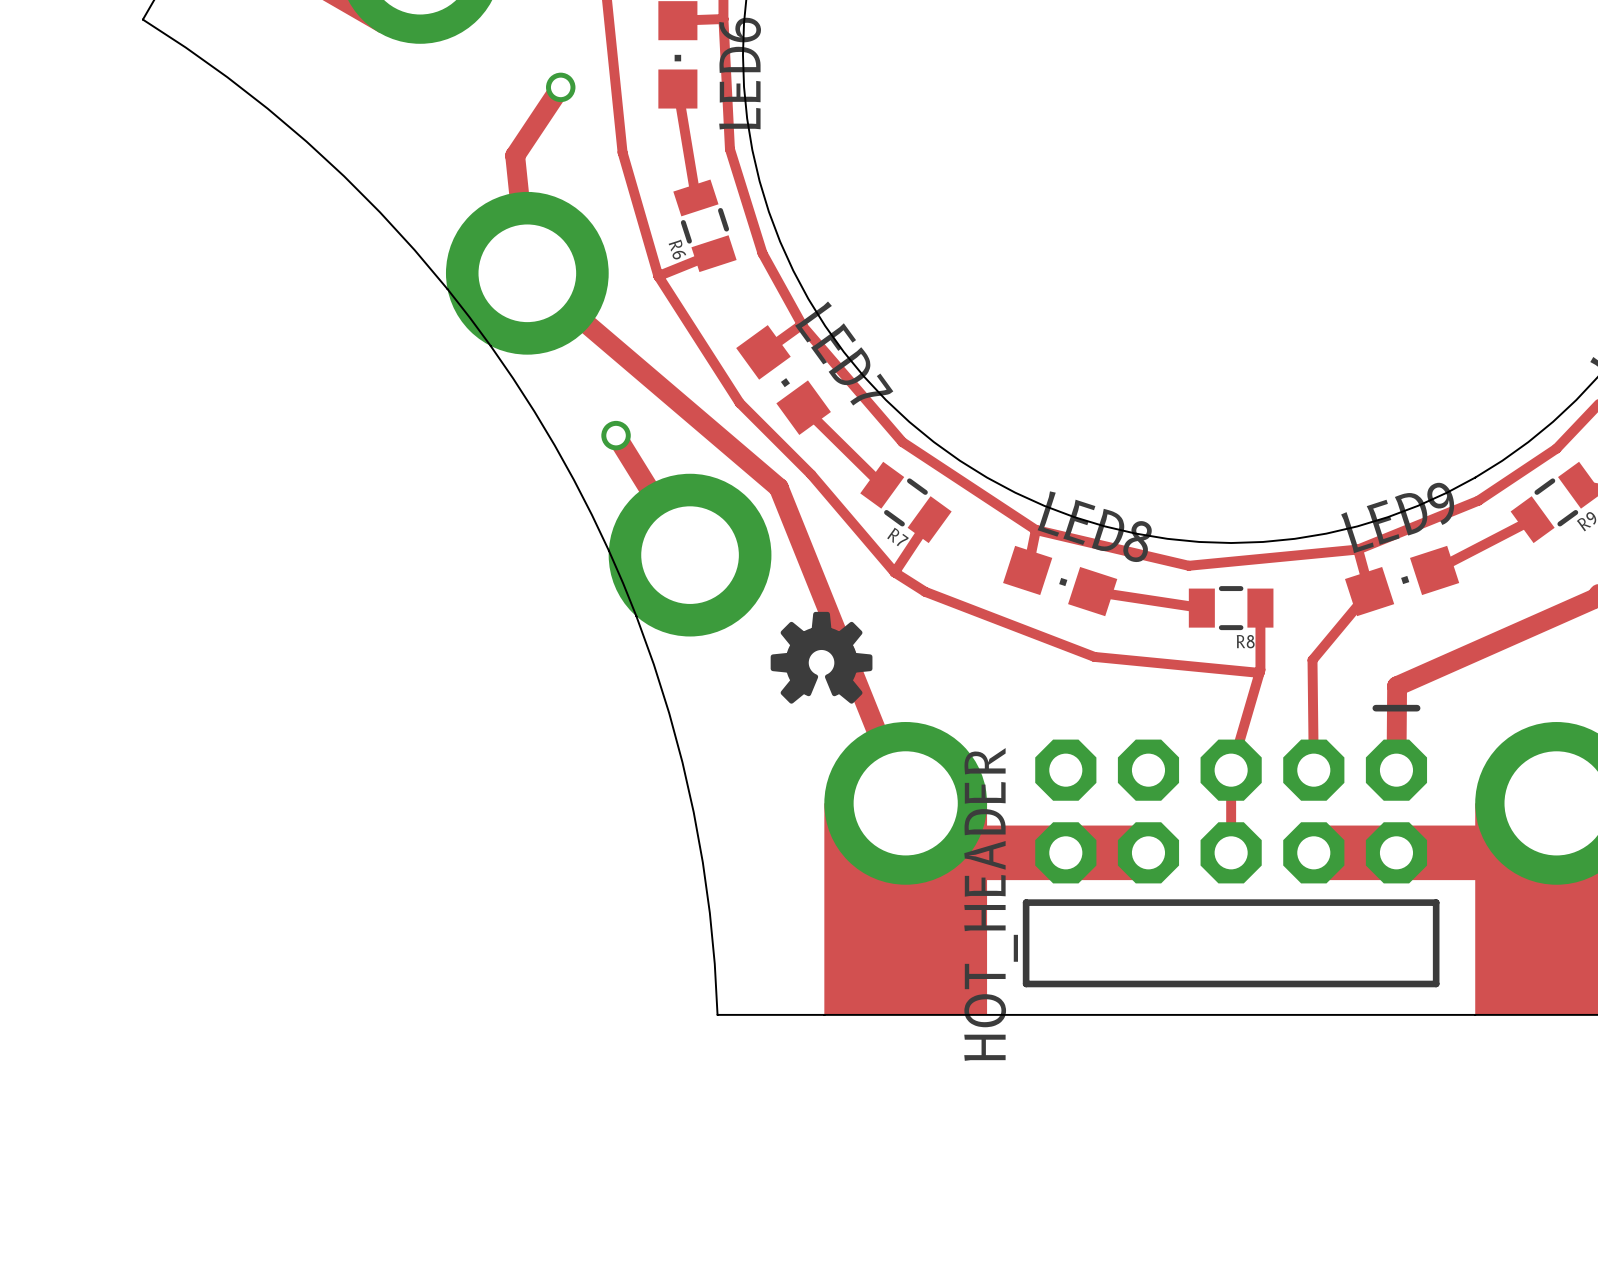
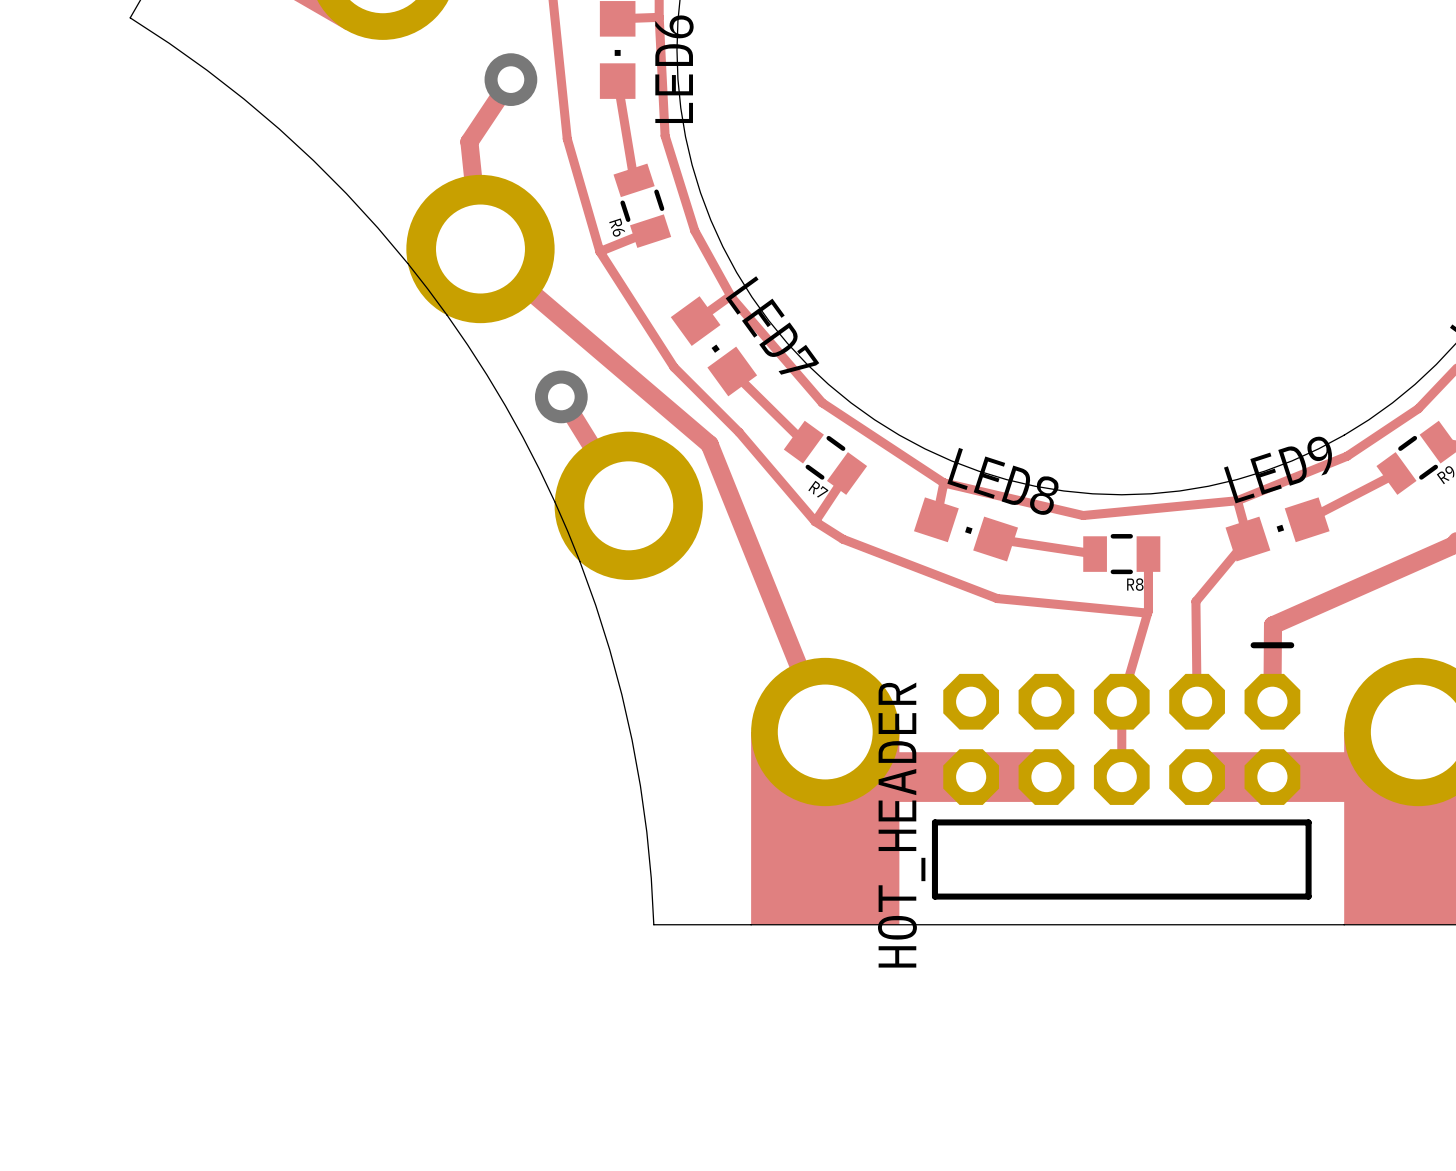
via size: [546, 72, 576, 103] -> [484, 53, 538, 106]
via size: [601, 420, 631, 451] -> [534, 370, 588, 424]
drawing: [770, 611, 873, 704] -> none

